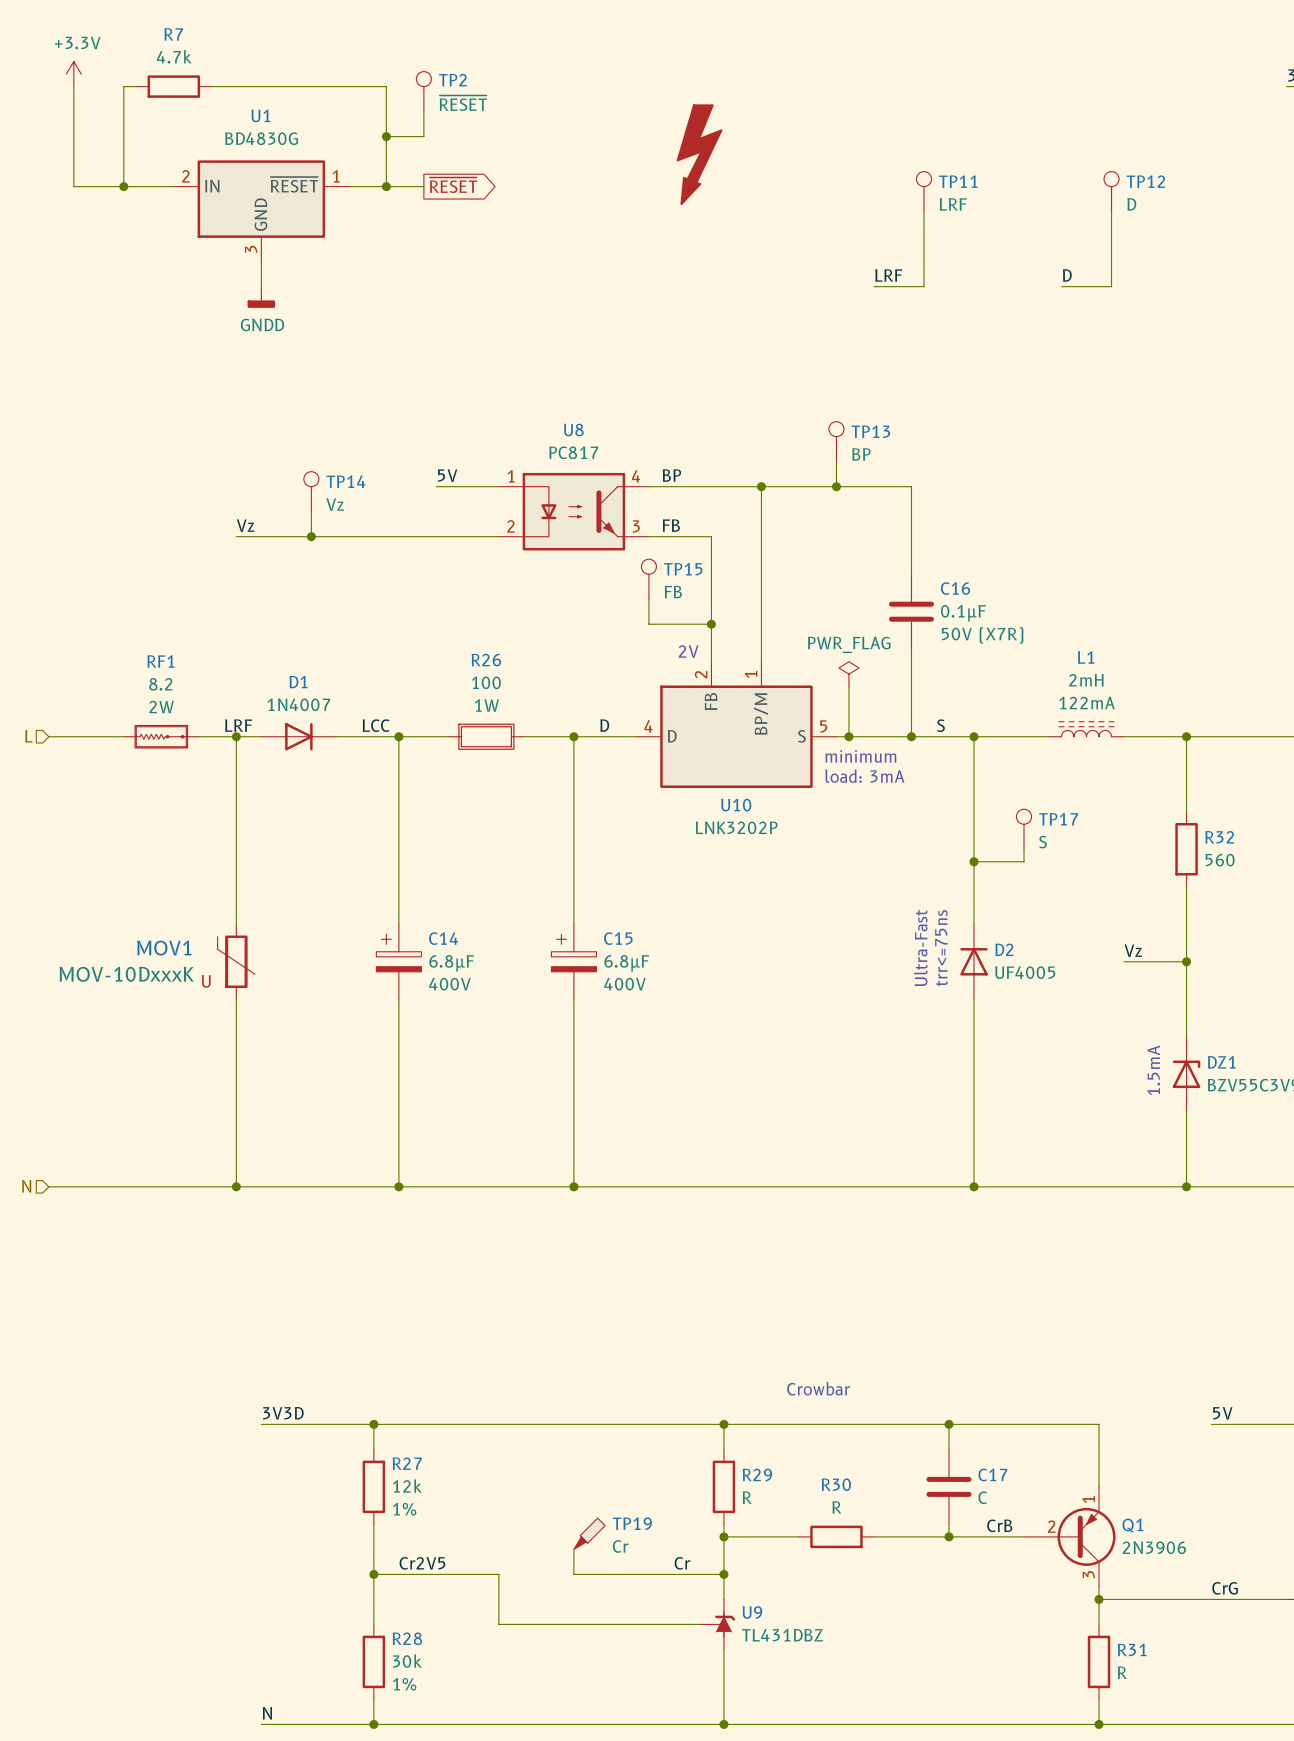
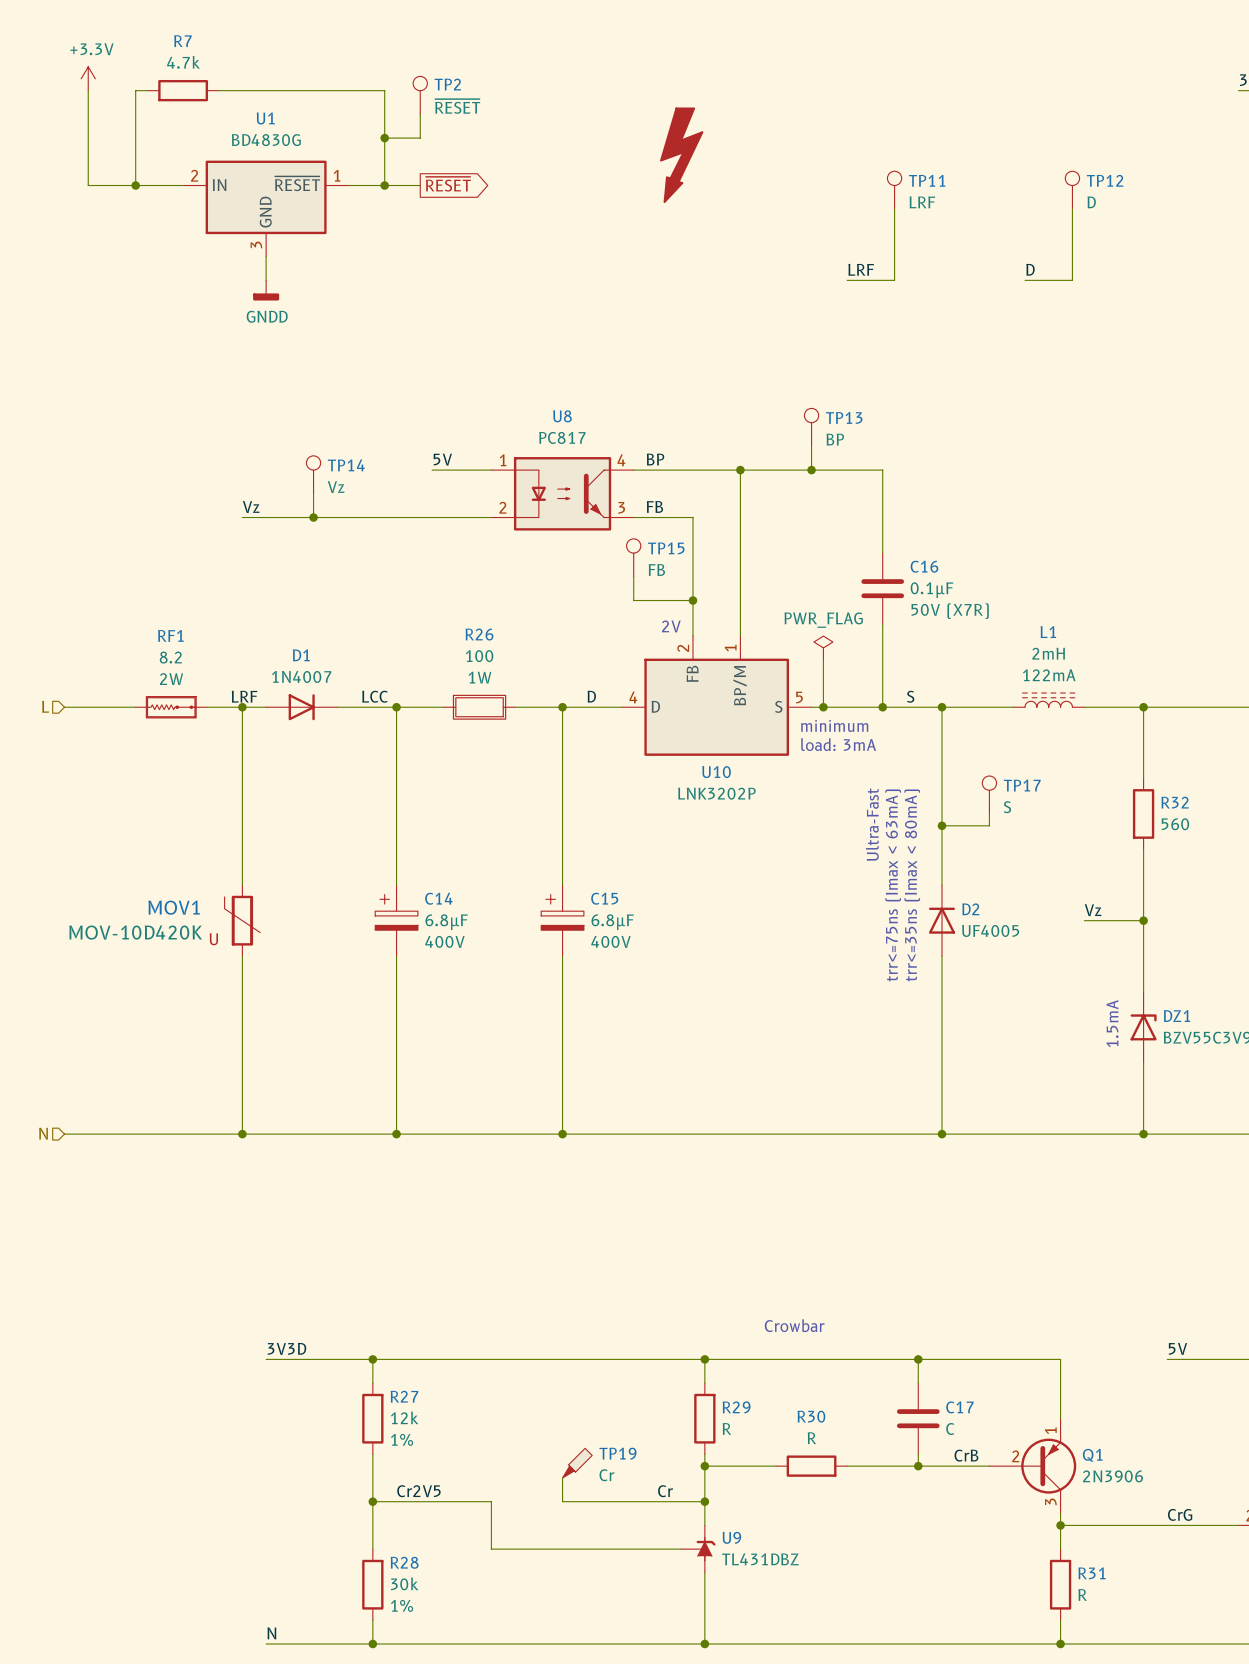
text: none -> trr<=75ns (Imax < 63mA) (893, 885)
text: none -> trr<=35ns (Imax < 80mA) (912, 885)
text position: Ultra-Fast (920, 948) -> Ultra-Fast (872, 824)
text: trr<=75ns (941, 948) -> none
MOV1 value: MOV-10DxxxK (126, 974) -> MOV-10D420K (135, 932)

